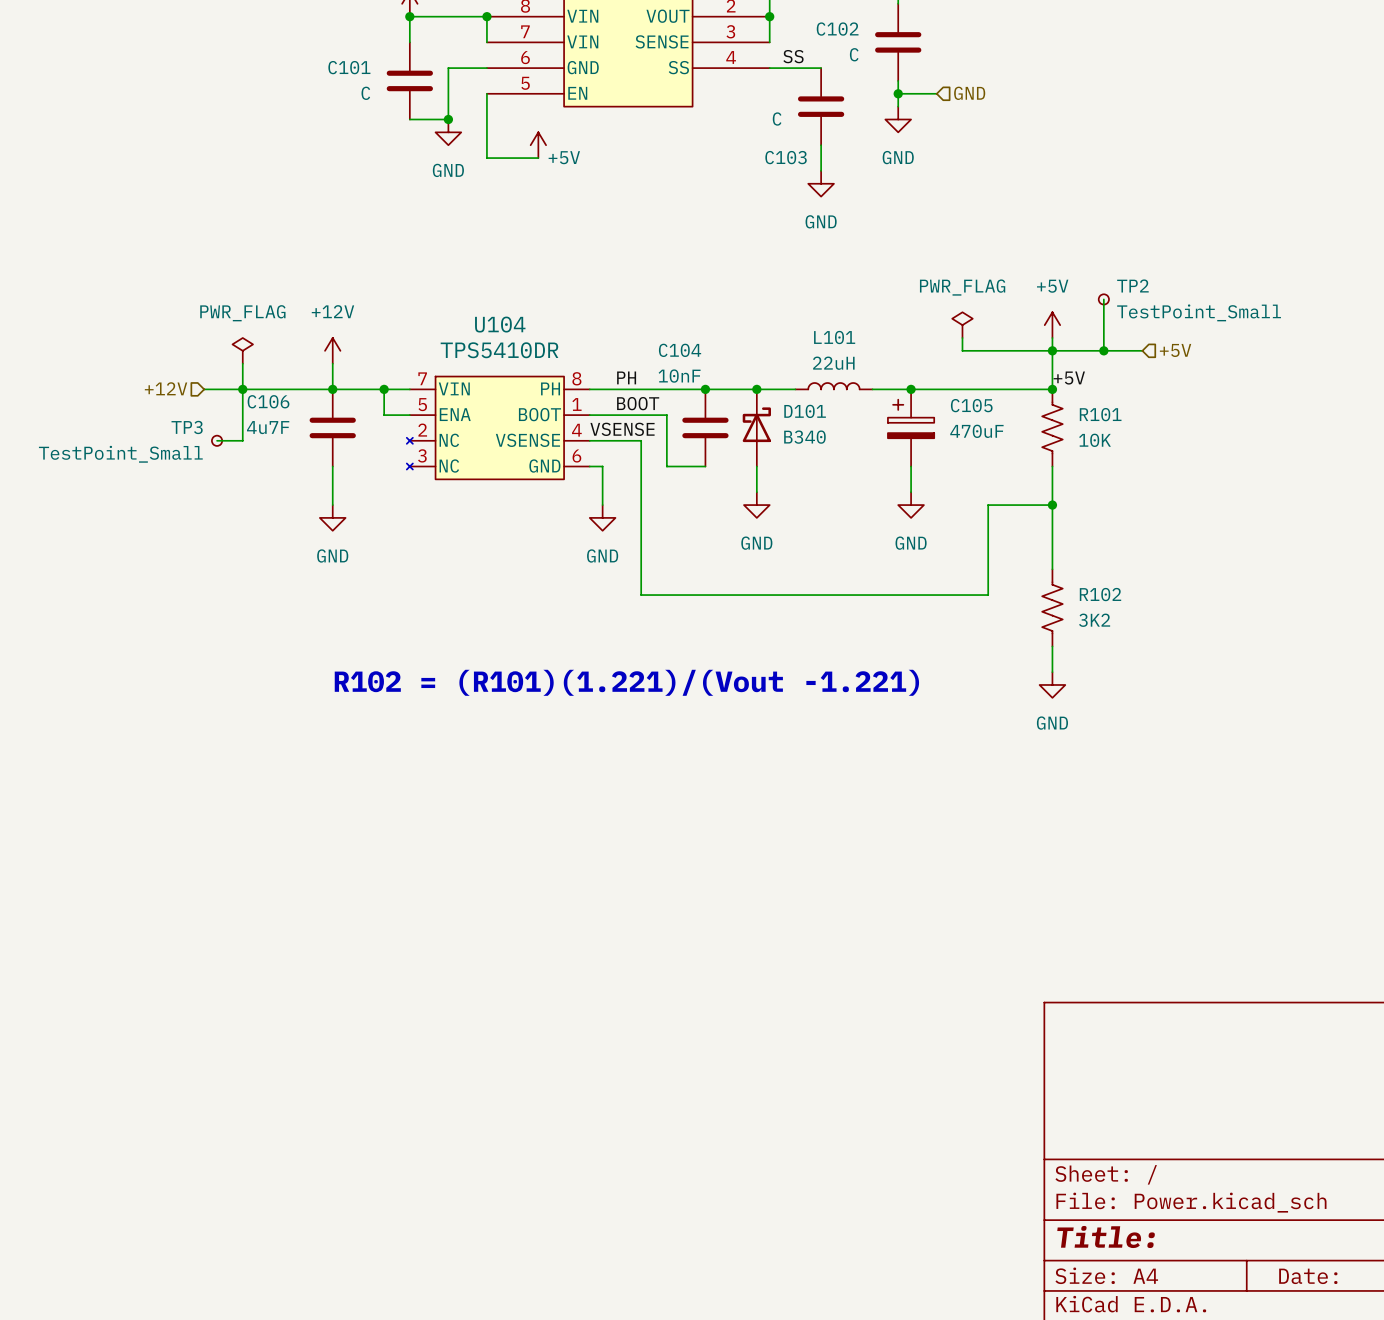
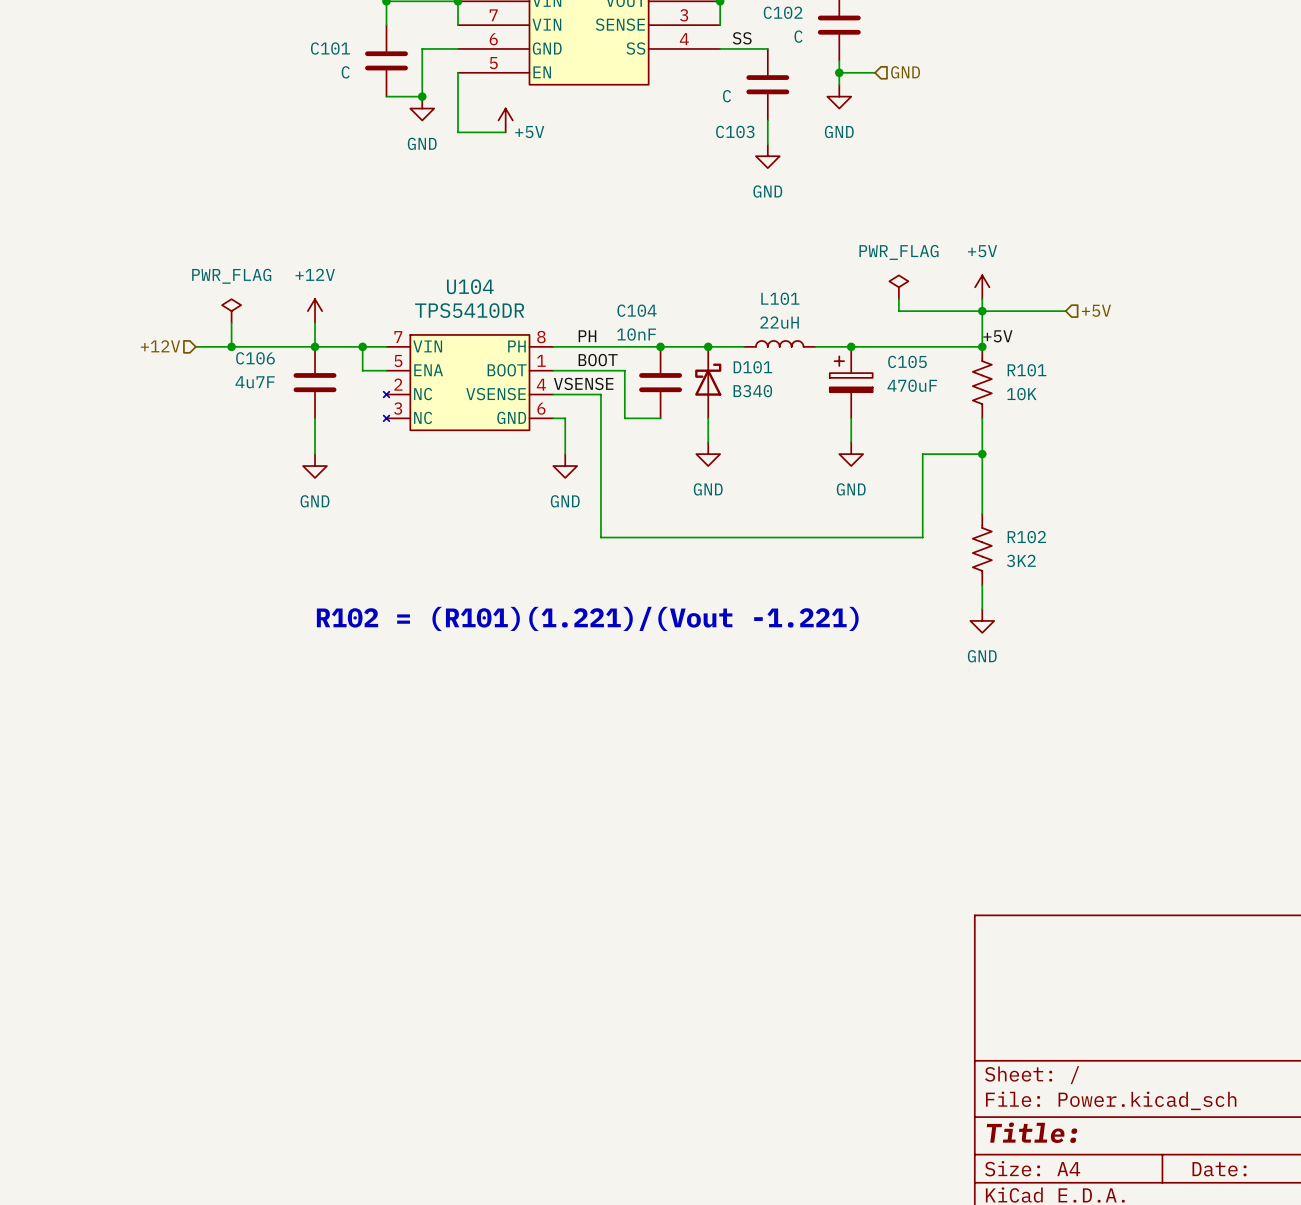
wire: (1103, 299) (1103, 350) -> none
TP2: TestPoint_Small (1103, 299) -> none
junction: (1103, 350) -> none
wire: (242, 389) (242, 440) (217, 440) -> none
TP3: TestPoint_Small (217, 440) -> none

